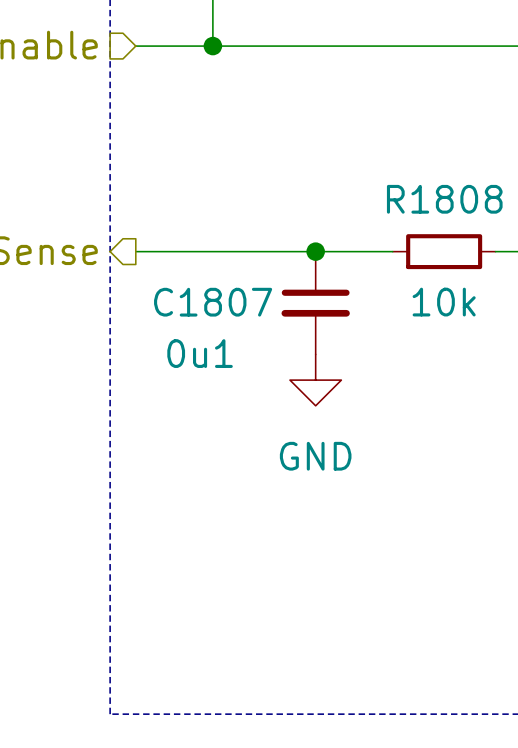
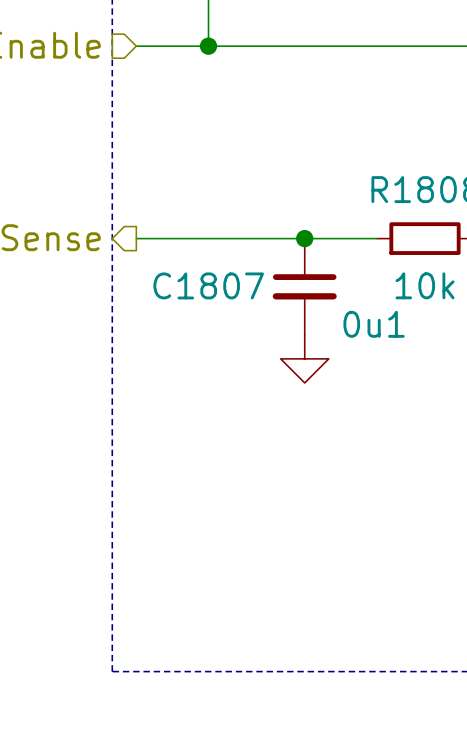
C1807 value position: 0u1 (200, 353) -> 0u1 (374, 324)
power symbol text: GND (315, 456) -> none

